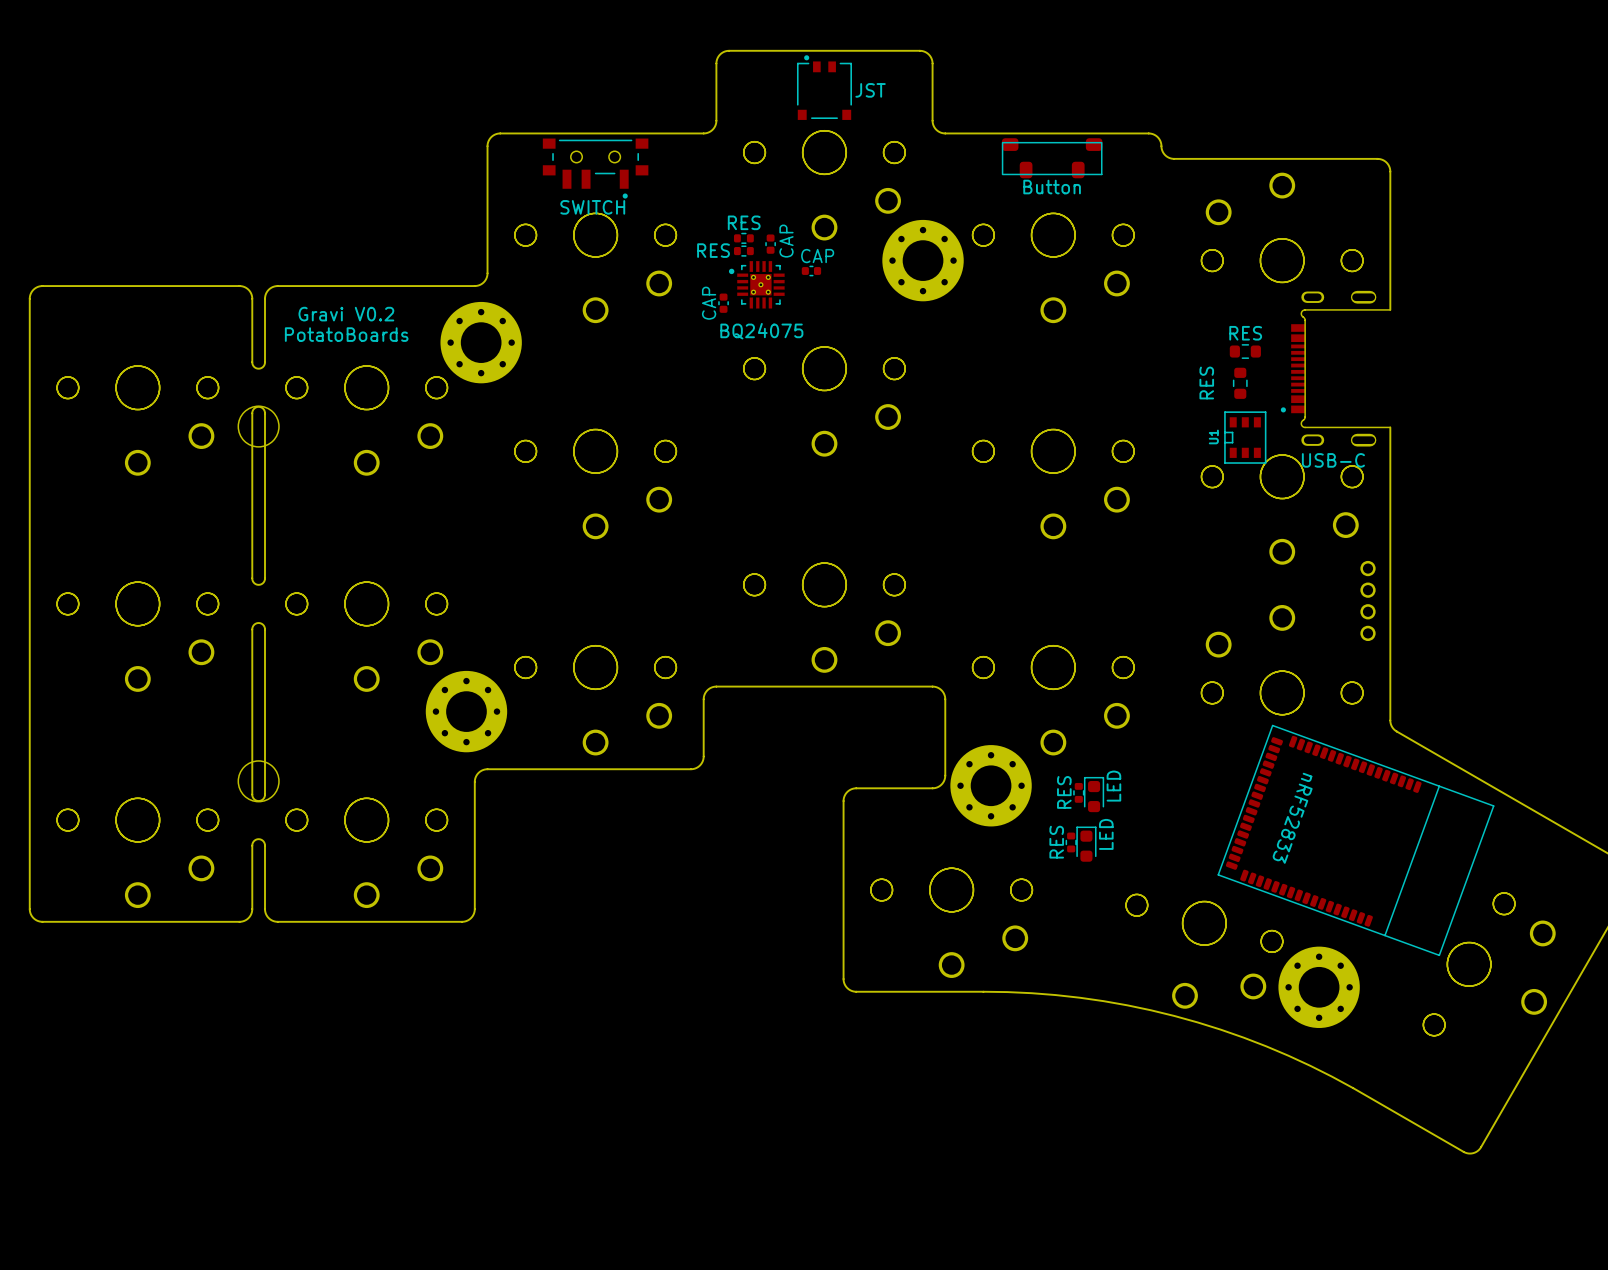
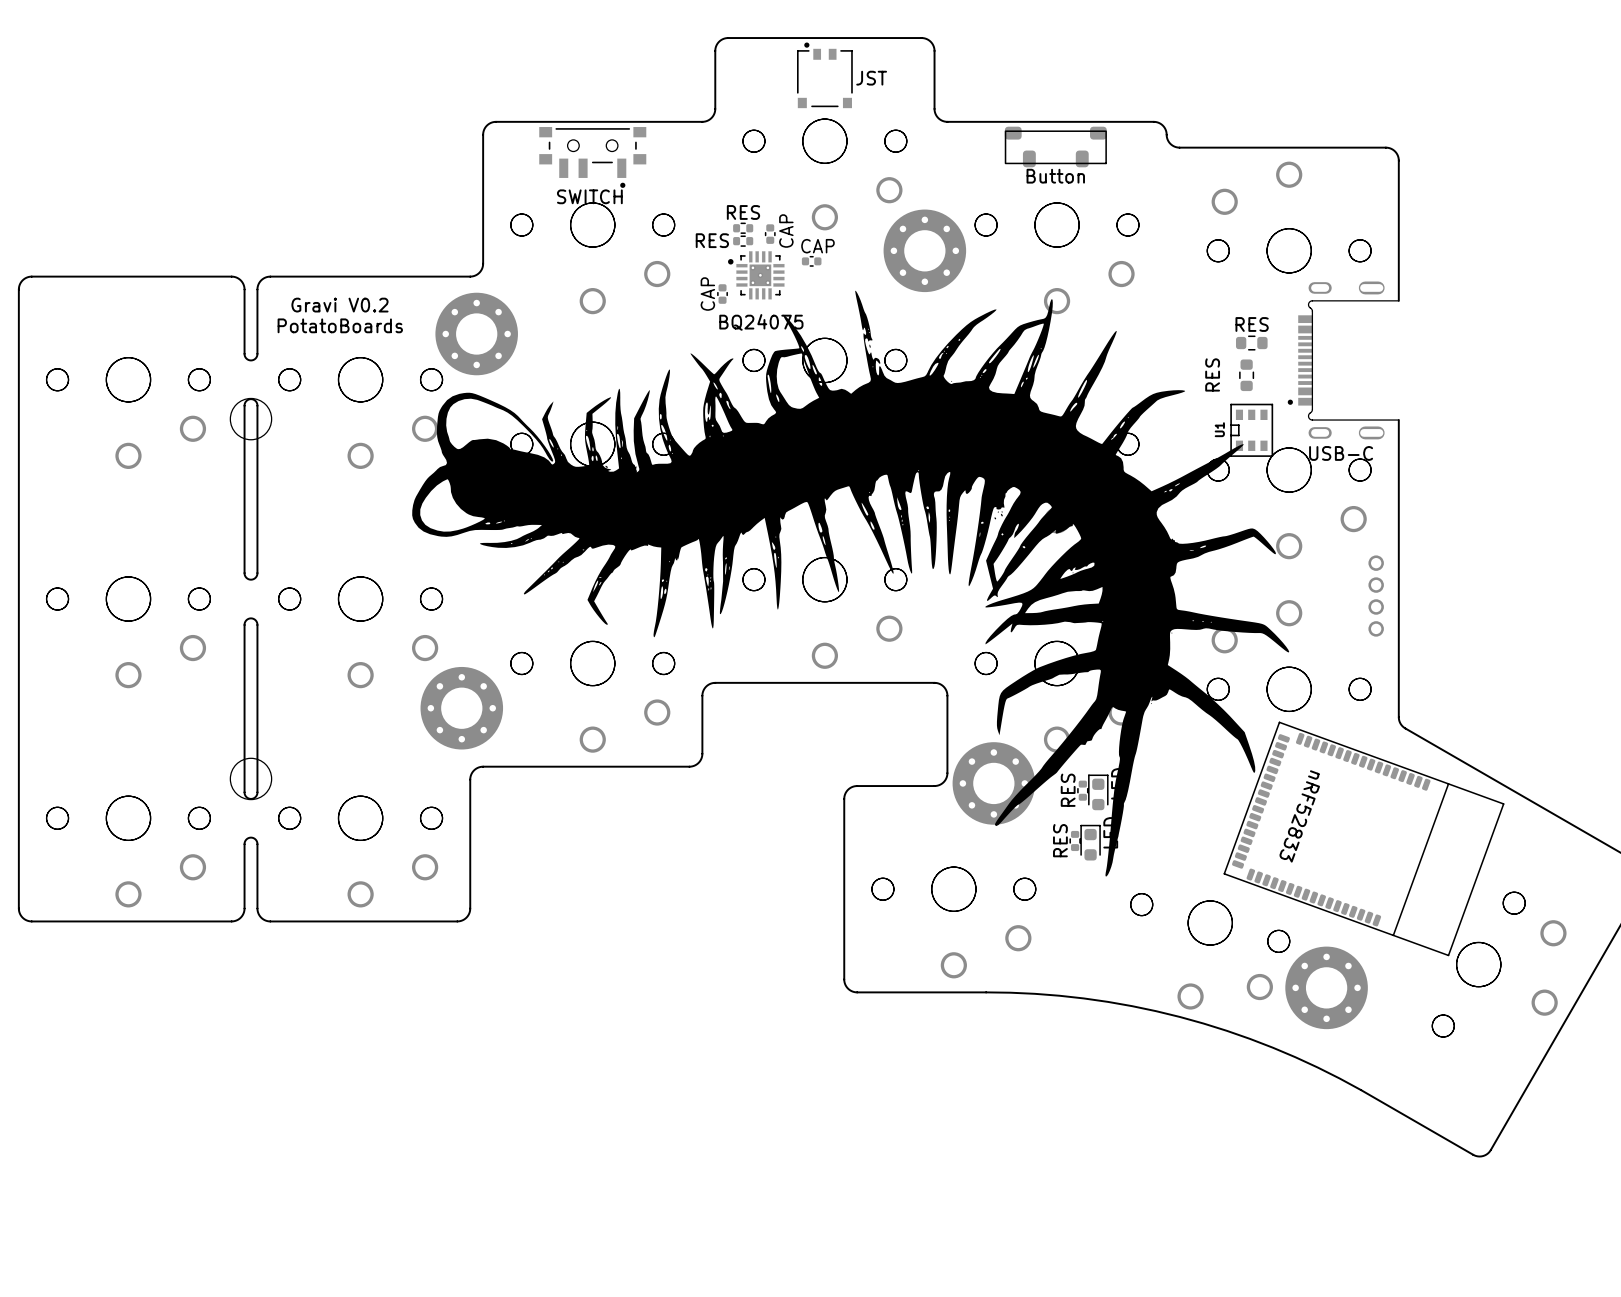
drawing: none -> [412, 290, 1290, 877]

